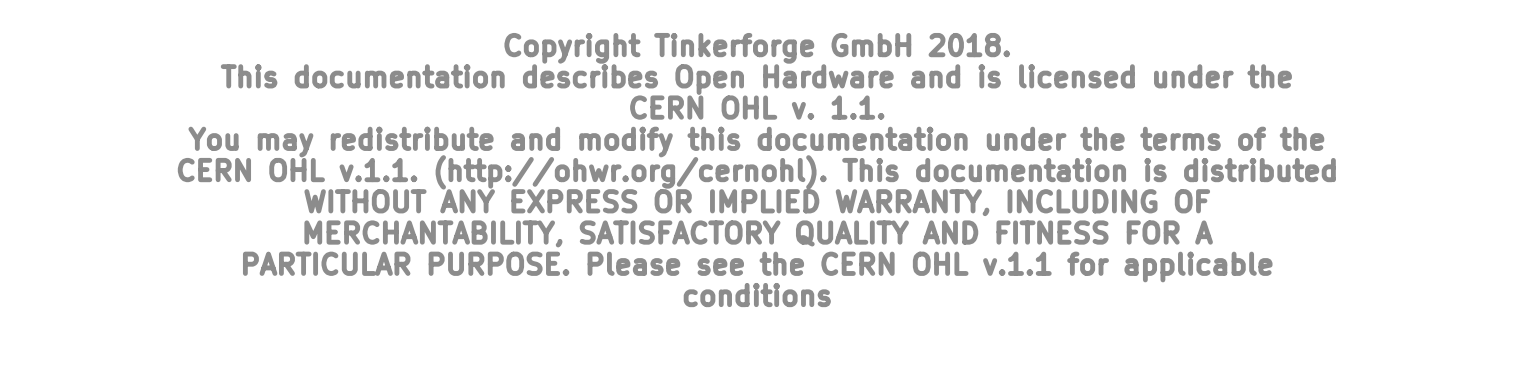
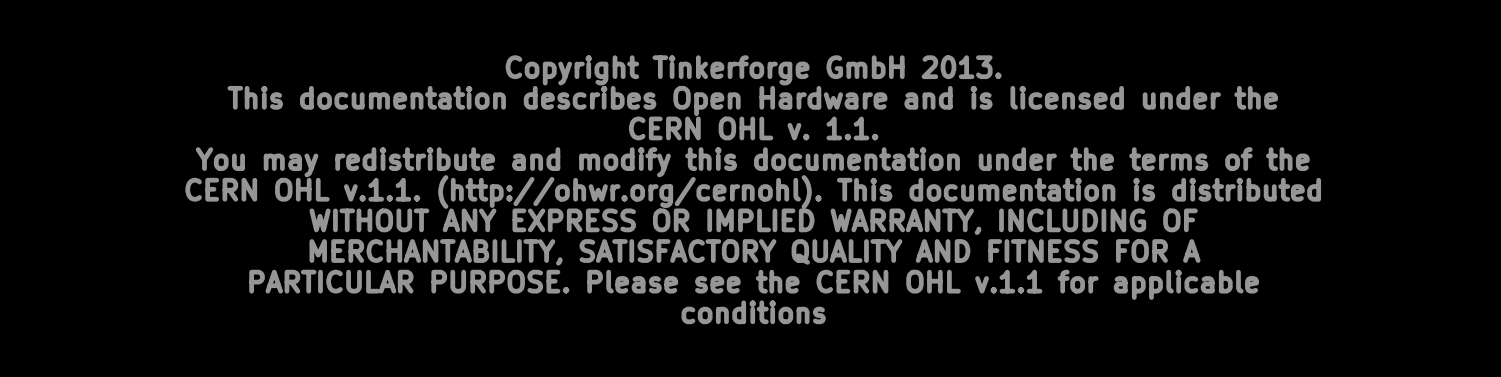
text: Copyright Tinkerforge GmbH 2018. (757, 48) -> Copyright Tinkerforge GmbH 2013. (753, 70)

